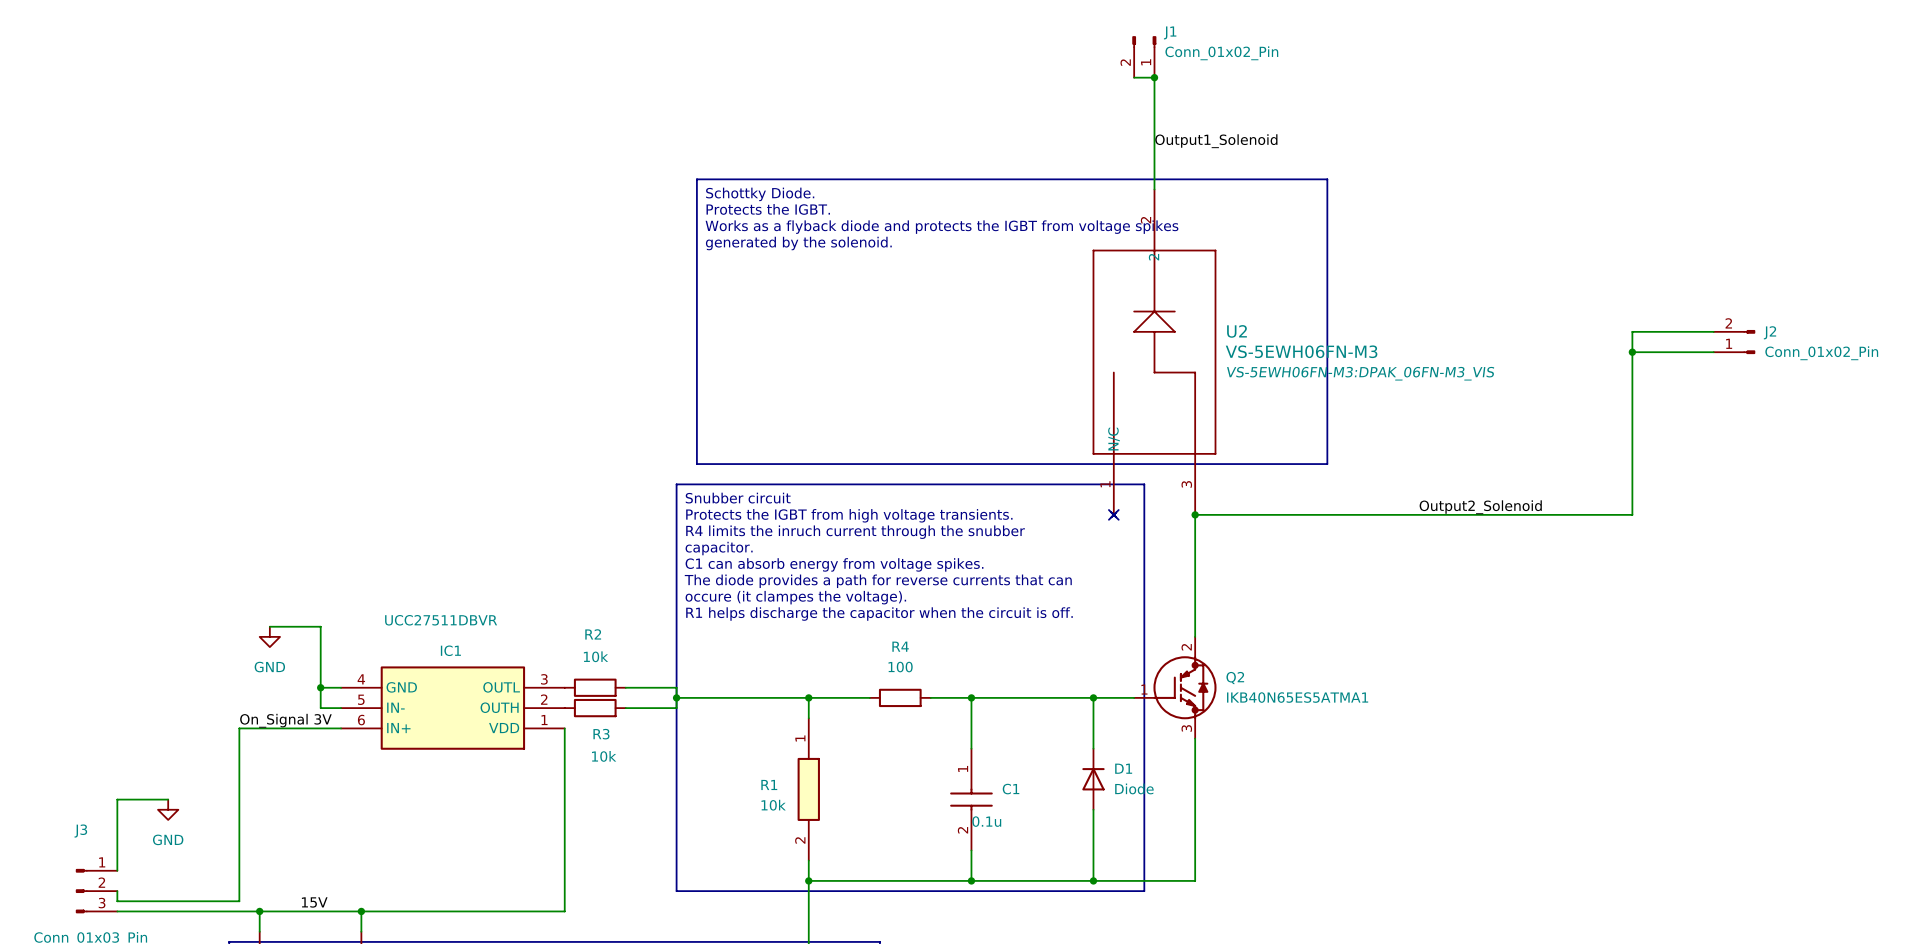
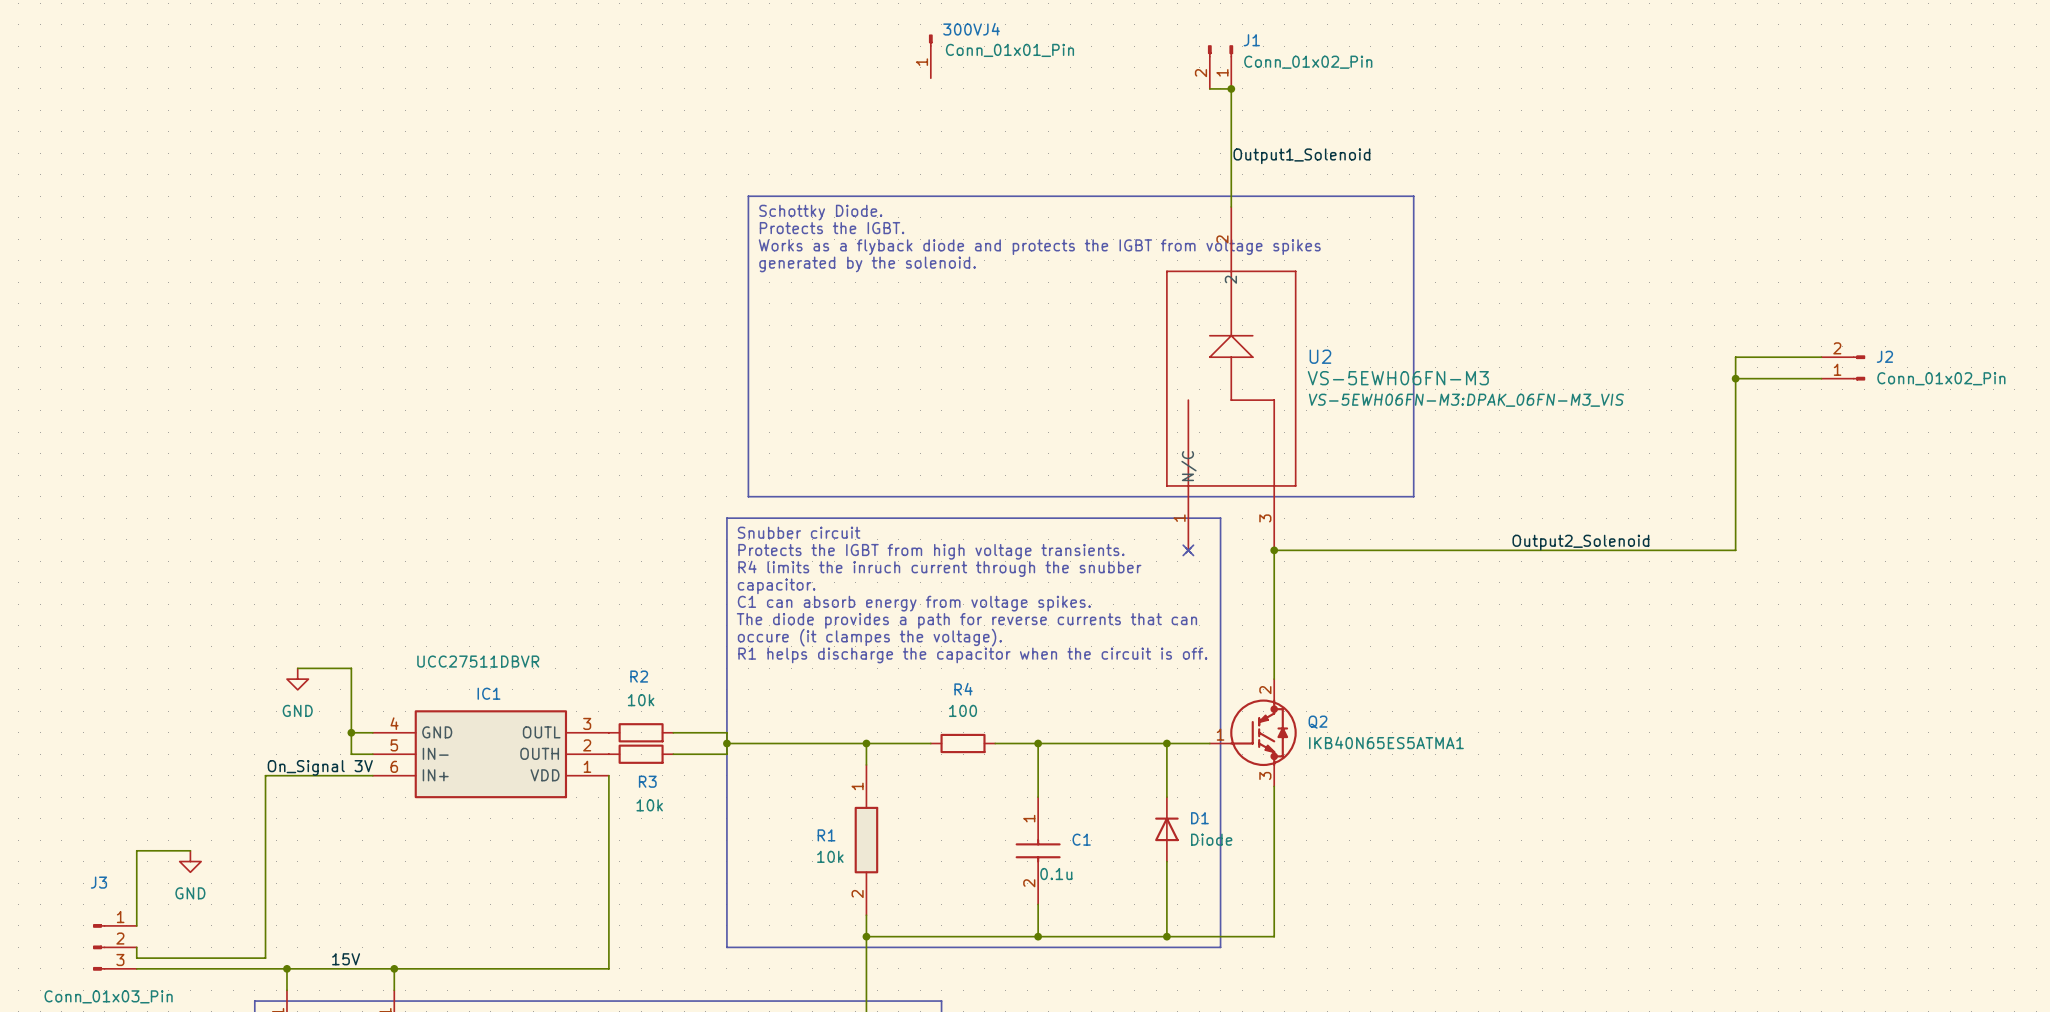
300VJ4: none -> Conn_01x01_Pin (930, 56)

